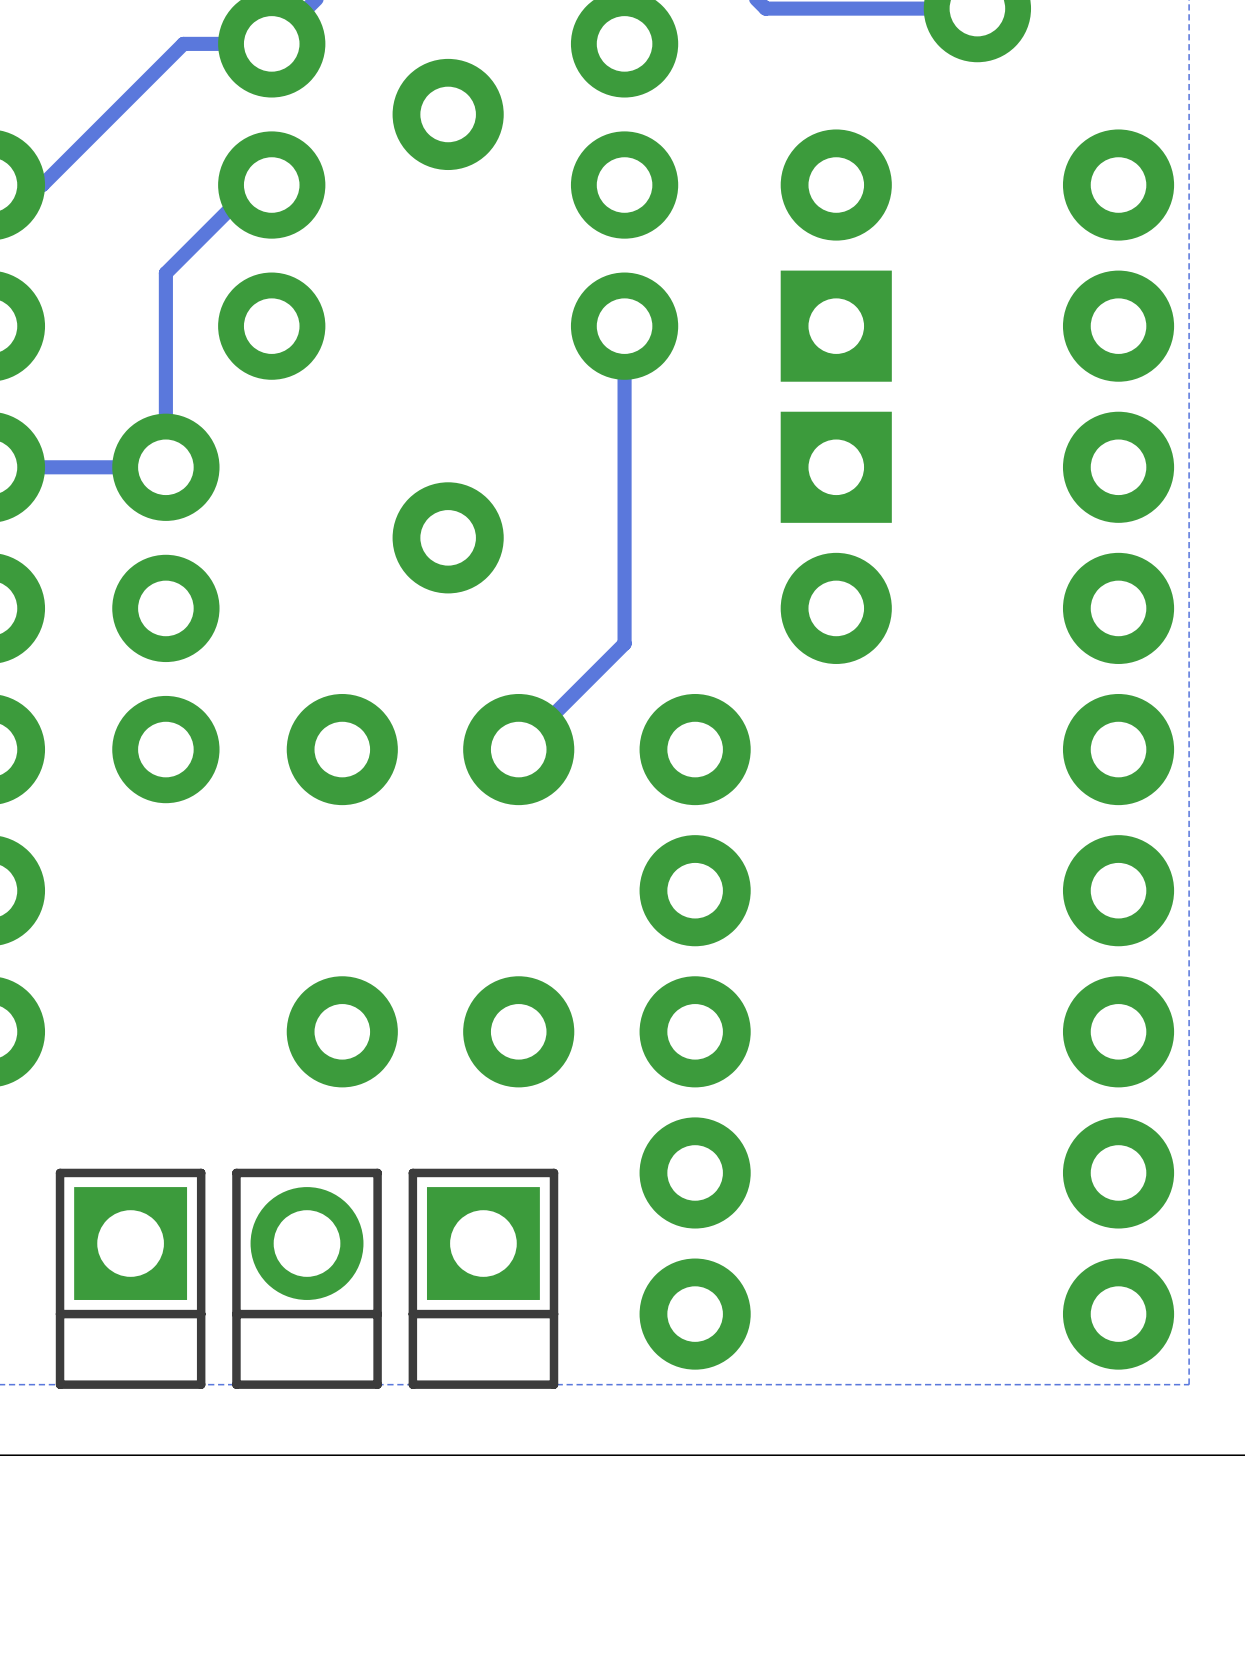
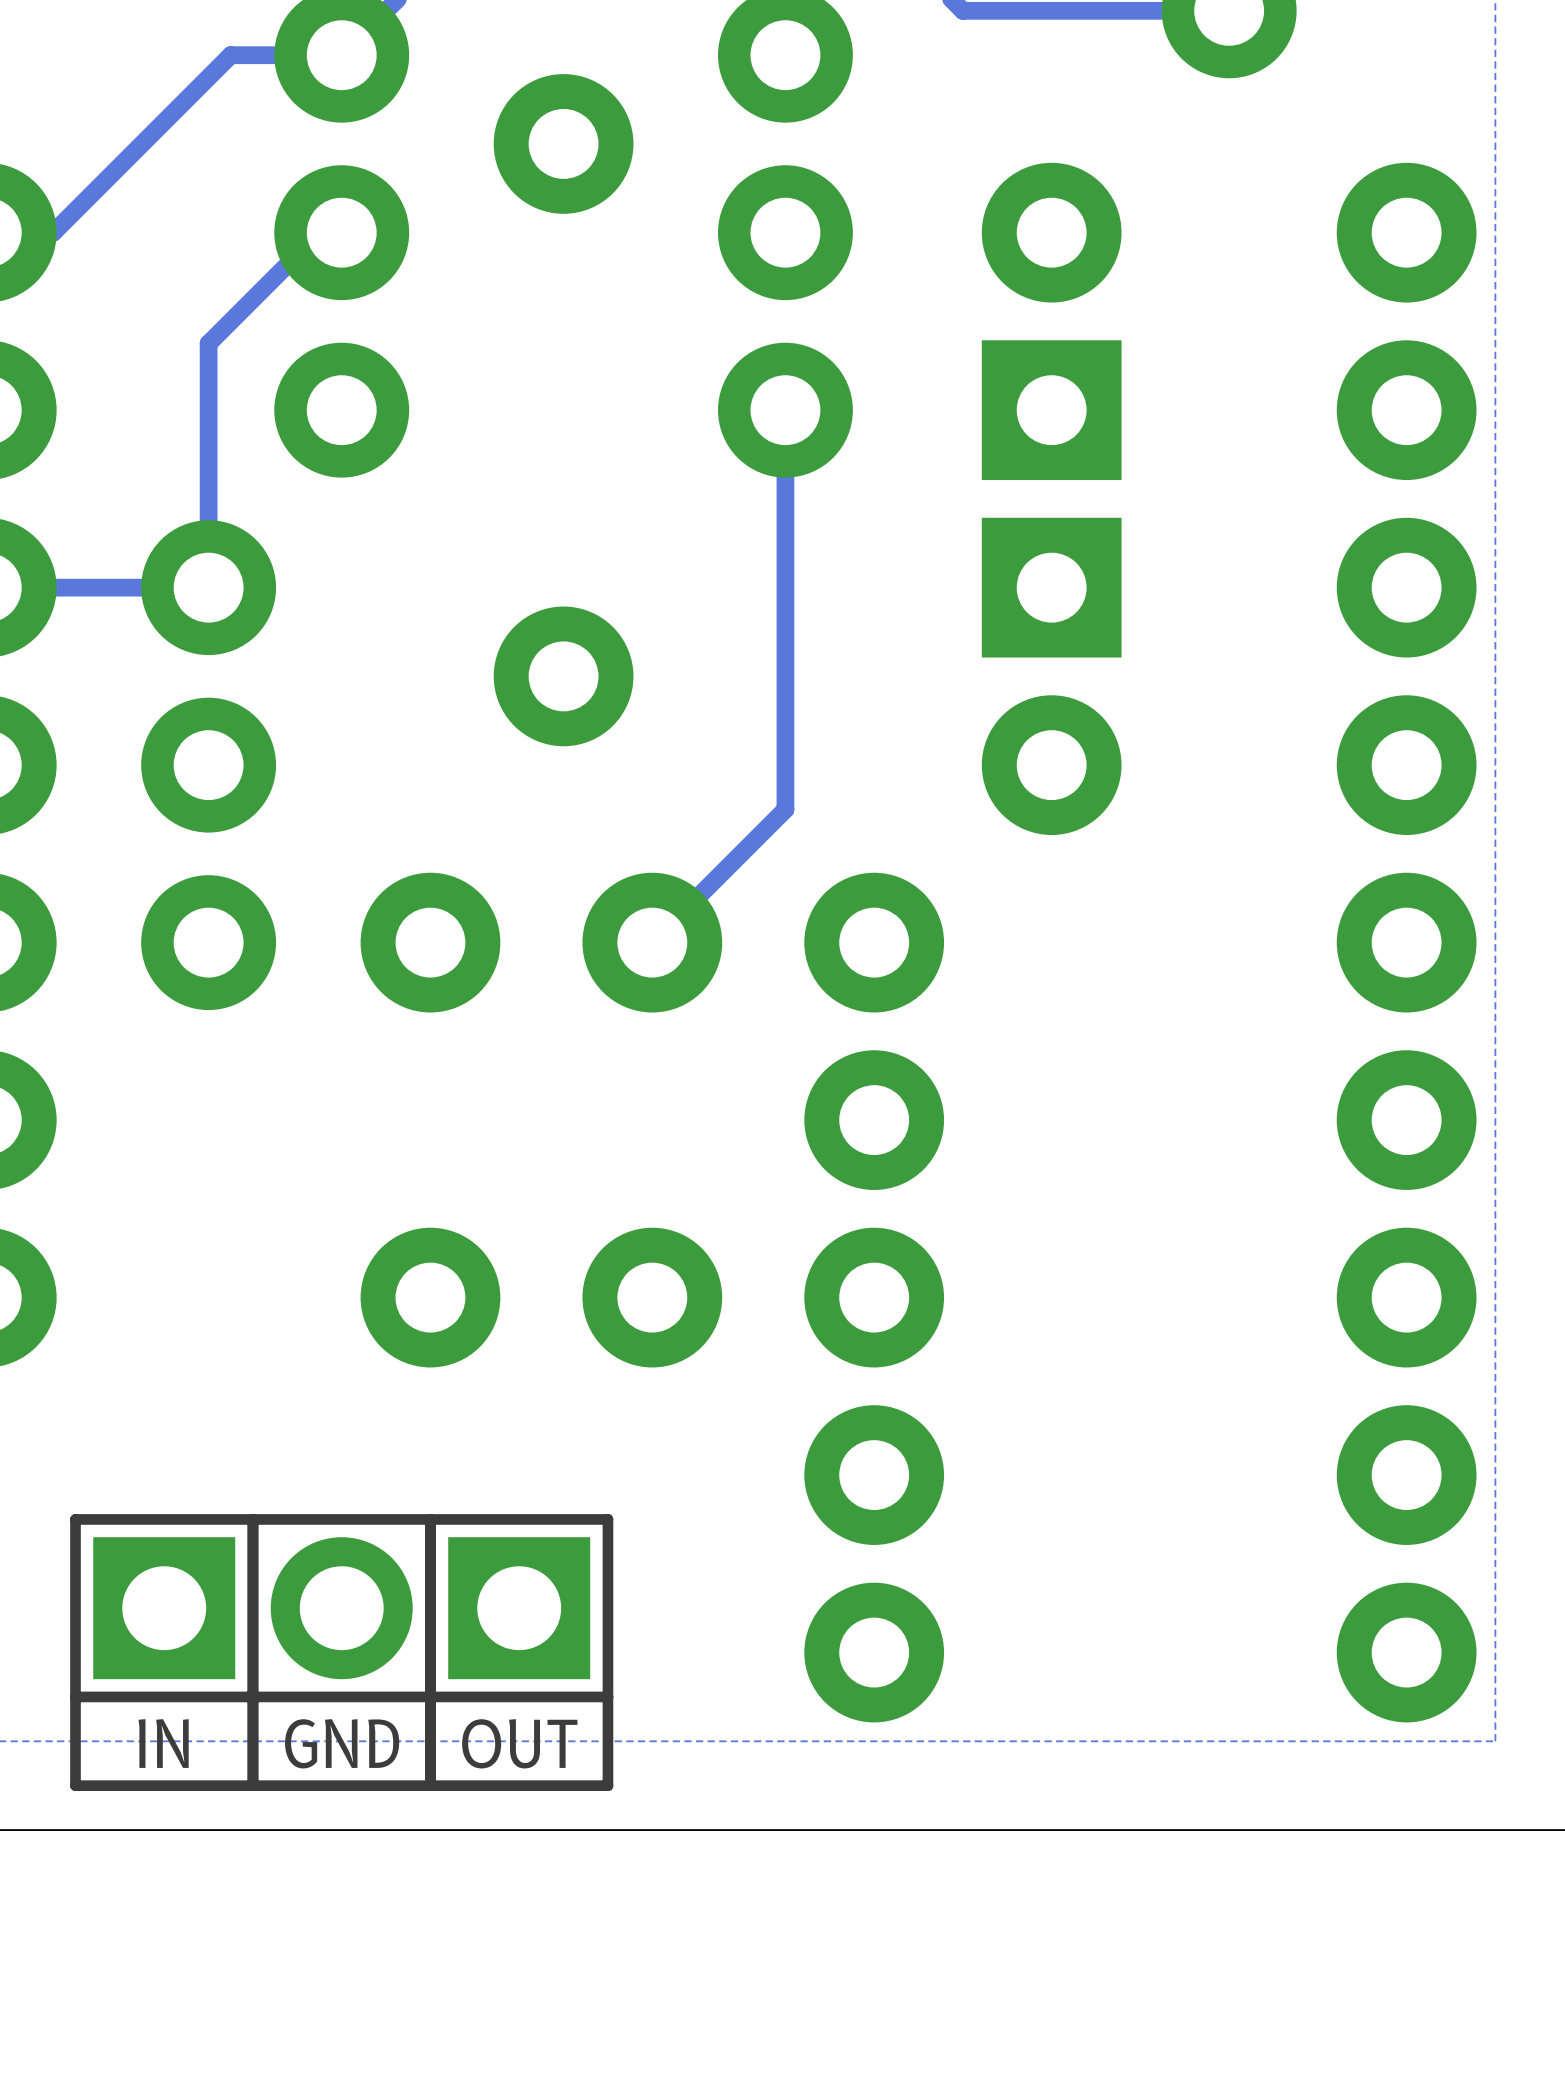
IN position: (130, 1278) -> (164, 1652)
GND position: (307, 1278) -> (341, 1652)
part: (483, 1278) -> none
OUT: none -> (519, 1652)
IN name: none -> IN (163, 1743)
GND name: none -> GND (342, 1743)

